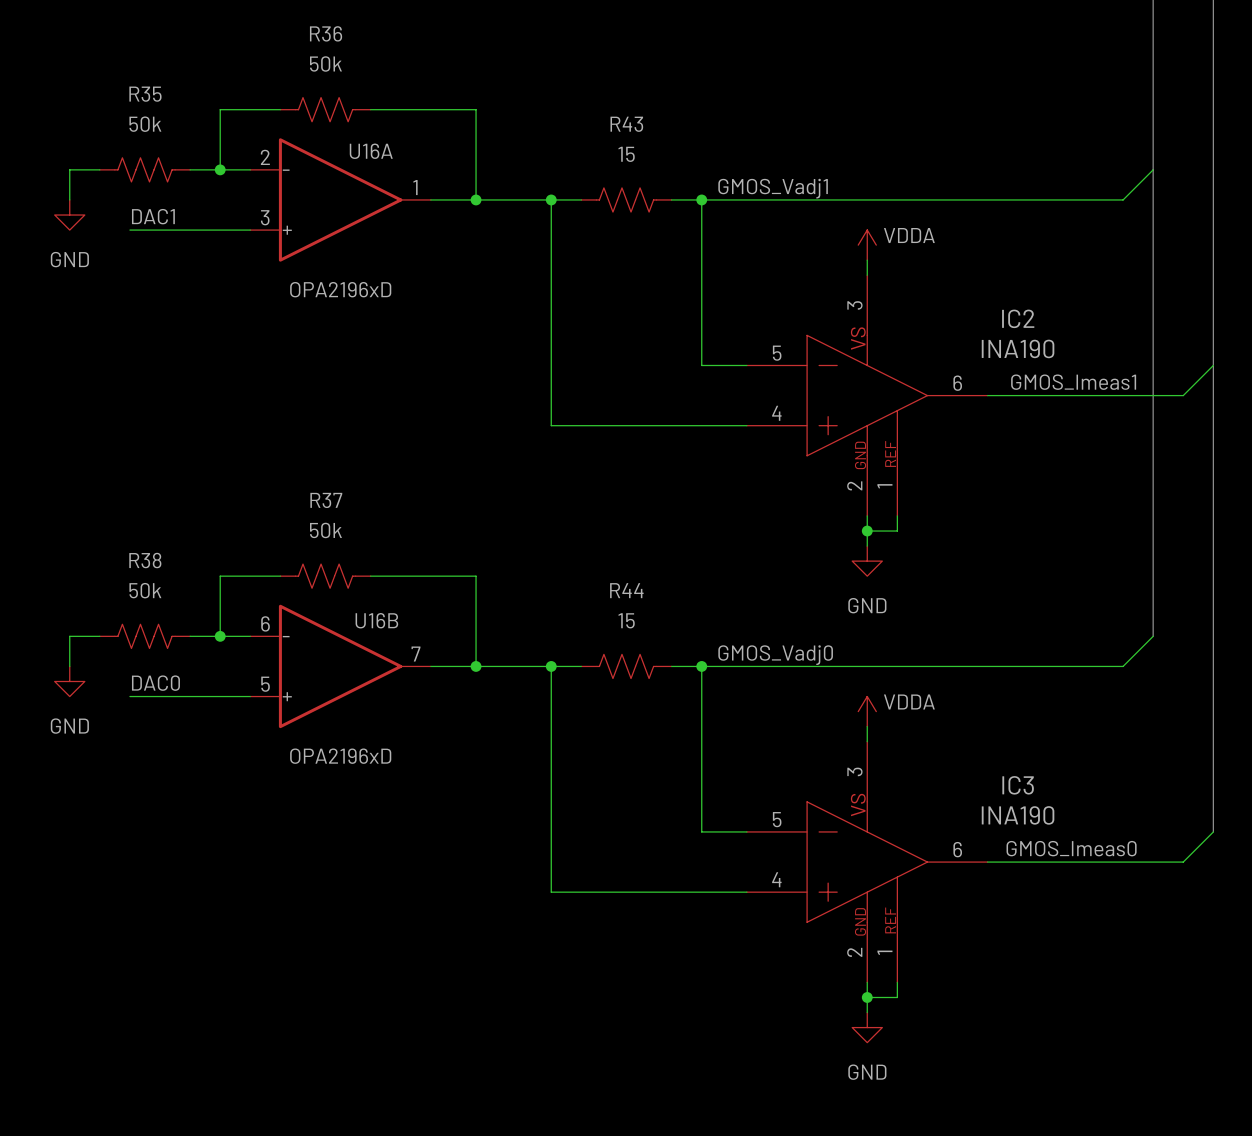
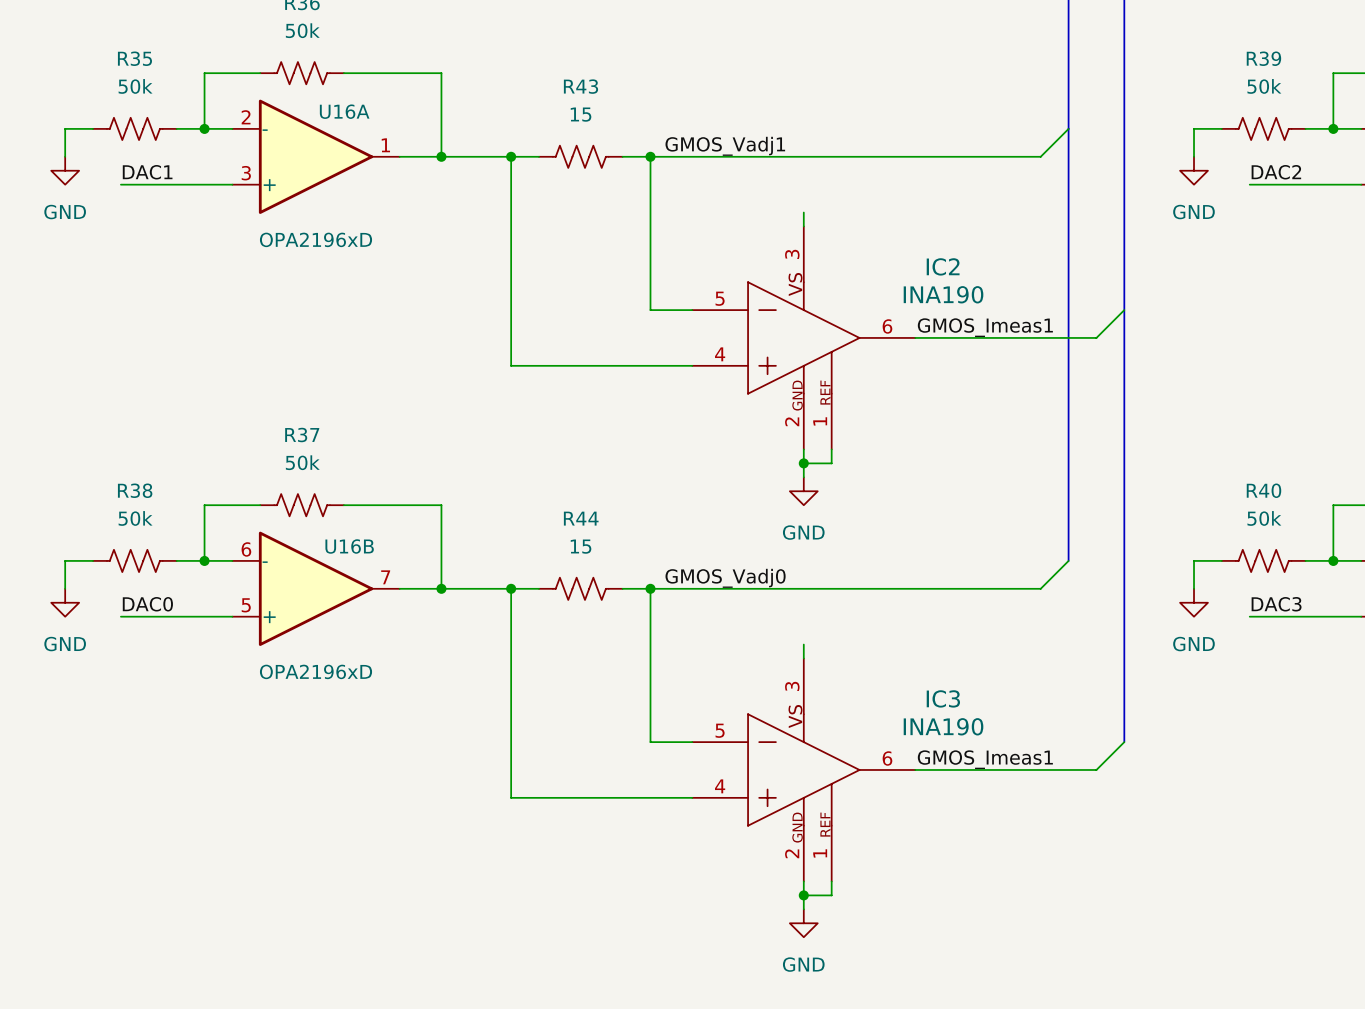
power symbol: VDDA (867, 245) -> none
power symbol: VDDA (867, 711) -> none
label: GMOS_Imeas0 (1071, 848) -> GMOS_Imeas1 (985, 759)

